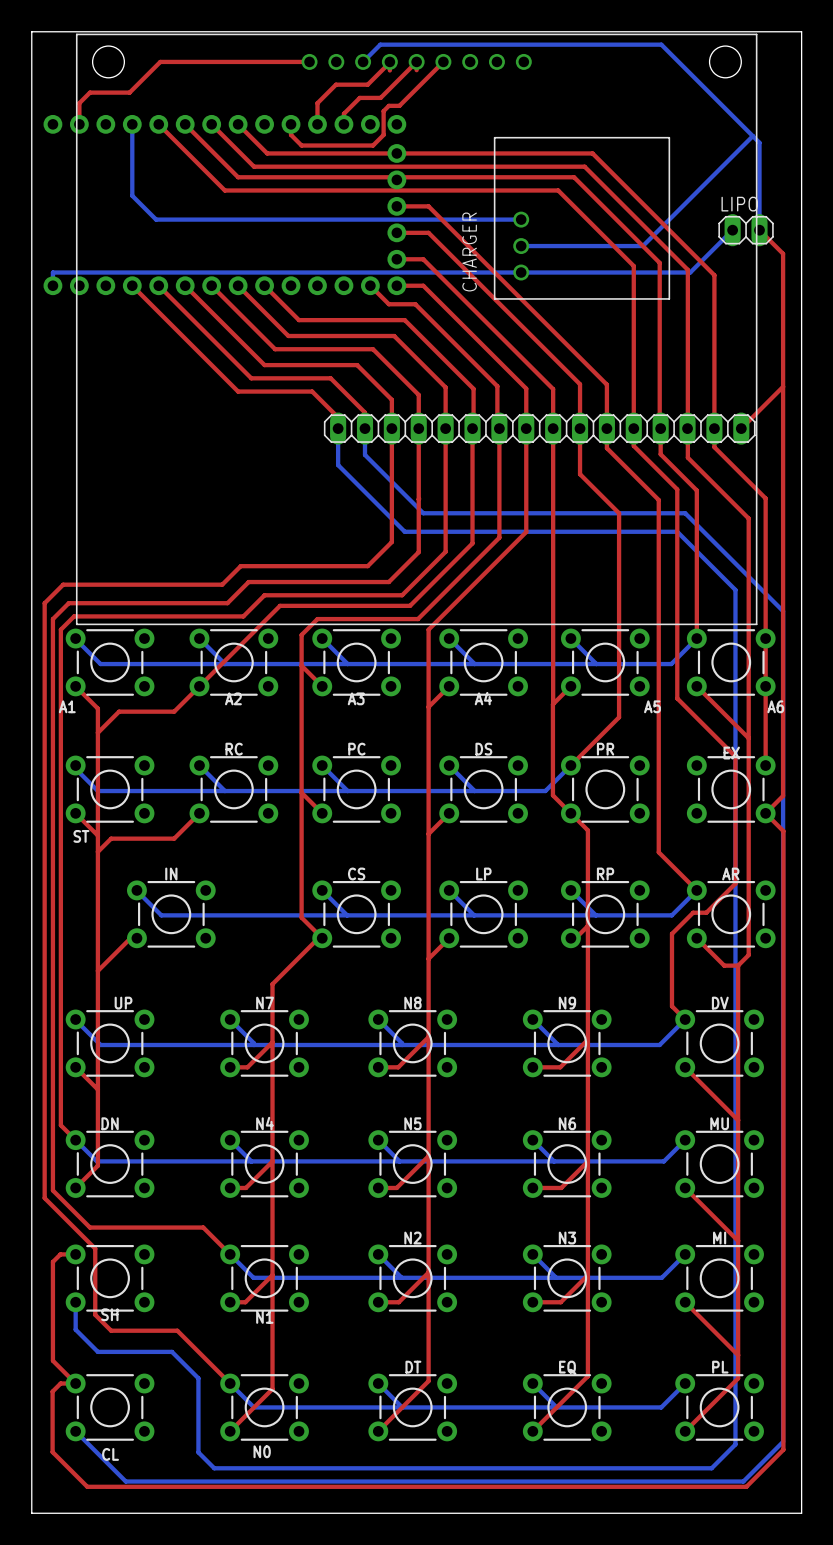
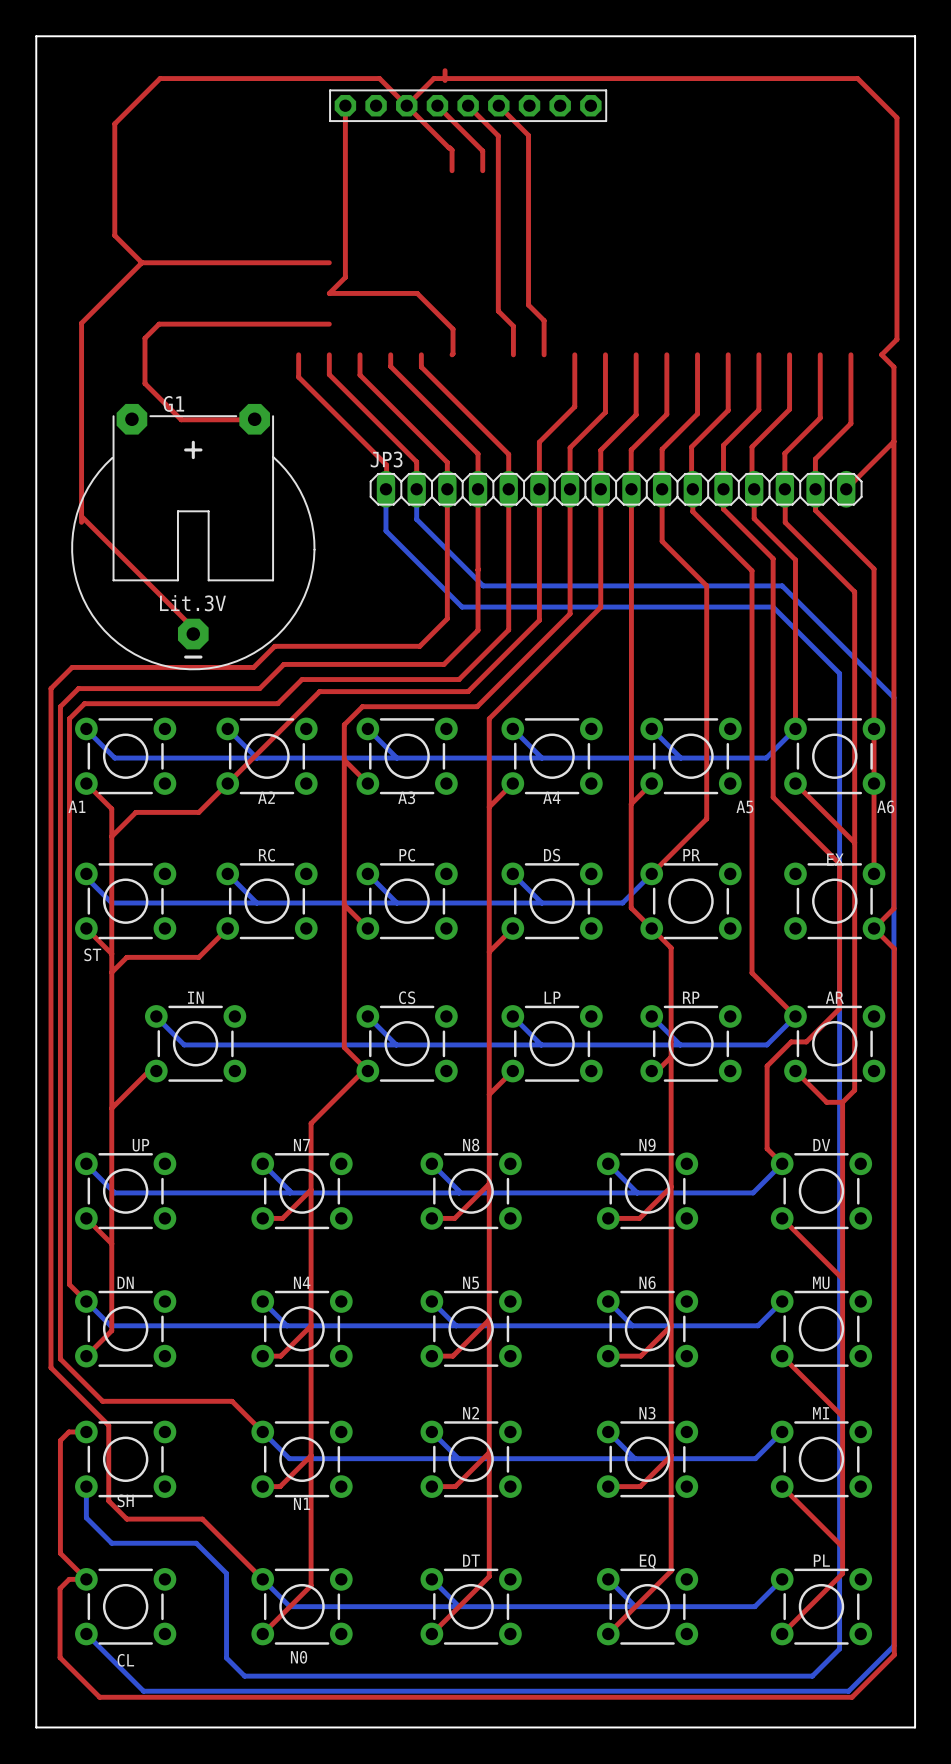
top track: (309, 61) (160, 61) (129, 92) (89, 92) (79, 103) (79, 124) -> none
bottom track: (363, 61) (380, 44) (661, 44) (759, 142) (759, 230) -> none
top track: (389, 62) (367, 84) (336, 84) (317, 103) (317, 124) -> none
top track: (443, 64) (443, 61) (399, 105) (388, 105) (383, 111) (383, 134) (373, 145) (301, 145) (291, 134) (291, 124) -> none
top track: (416, 70) (416, 61) (380, 97) (359, 97) (343, 113) (343, 124) -> none
top track: none -> (345, 105) (345, 277) (329, 293) (417, 293) (453, 329) (452, 354)
top track: none -> (437, 105) (482, 151) (482, 170)
part: none -> (468, 105)
bottom track: (132, 124) (132, 195) (156, 219) (521, 219) -> none
top track: (158, 124) (224, 190) (558, 190) (633, 266) (633, 390) -> (758, 354) (758, 409) (723, 445)
top track: (185, 124) (238, 177) (574, 177) (659, 262) (659, 427) -> none
top track: (211, 124) (253, 166) (584, 166) (687, 269) (687, 428) -> none
top track: (238, 124) (267, 153) (592, 153) (714, 275) (714, 428) -> none
bottom track: (752, 136) (642, 246) (521, 246) -> none
top track: none -> (452, 170) (452, 150) (379, 78) (160, 78) (114, 123) (114, 235) (141, 262)
part: (224, 205) -> none
top track: (396, 206) (428, 206) (606, 384) (606, 428) -> none
CHARGER: (581, 218) -> none
top track: none -> (141, 262) (329, 262)
top track: none -> (141, 262) (81, 323) (81, 522)
bottom track: (732, 230) (690, 272) (52, 272) (52, 285) -> none
LIPO: (746, 230) -> none
top track: (759, 230) (783, 253) (783, 321) -> (406, 105) (433, 78) (857, 78) (896, 117) (896, 339) (881, 354) (893, 367)
top track: (396, 232) (428, 232) (462, 267) -> (498, 105) (528, 135) (528, 305)
top track: (396, 259) (423, 259) (436, 272) -> (468, 105) (498, 135) (498, 311)
top track: (476, 280) (580, 384) (580, 393) -> (544, 320) (544, 354)
top track: none -> (329, 324) (159, 324) (144, 338) (144, 383) (181, 419) (254, 419)
top track: (132, 285) (238, 391) (312, 391) (338, 418) -> (298, 354) (298, 377) (386, 465) (386, 477)
top track: (158, 285) (251, 378) (330, 378) (365, 412) -> (329, 354) (329, 374) (416, 461) (416, 471)
top track: (185, 285) (264, 365) (357, 365) (391, 399) (391, 405) -> (360, 354) (360, 375) (447, 462)
top track: (211, 285) (275, 349) (373, 349) (418, 394) (418, 397) -> (390, 354) (390, 366) (478, 453)
top track: (238, 285) (288, 336) (394, 336) (445, 387) (445, 398) -> (421, 354) (421, 367) (508, 454)
top track: (264, 285) (298, 320) (404, 320) (473, 388) (472, 431) -> none
top track: (370, 285) (388, 304) (415, 304) (497, 386) (497, 426) (499, 428) -> (605, 354) (605, 412) (570, 447) (570, 489)
top track: (396, 285) (423, 285) (526, 388) (526, 394) -> (636, 354) (636, 414) (600, 450)
top track: (449, 285) (553, 389) (553, 428) -> (666, 354) (666, 414) (631, 450) (631, 489)
top track: none -> (513, 326) (513, 354)
top track: none -> (574, 354) (574, 406) (539, 442) (539, 489)
top track: none -> (697, 354) (697, 413) (662, 449)
top track: none -> (728, 354) (728, 410) (691, 446) (691, 488)
top track: none -> (789, 354) (789, 409) (752, 446) (752, 487)
top track: none -> (820, 354) (820, 417) (784, 453) (784, 489)
top track: none -> (850, 354) (850, 423) (815, 459) (815, 498)
part: (416, 329) -> none
JP3 name: none -> JP3 (386, 459)
top track: none -> (81, 516) (193, 628) (193, 634)
G1: none -> (193, 537)

